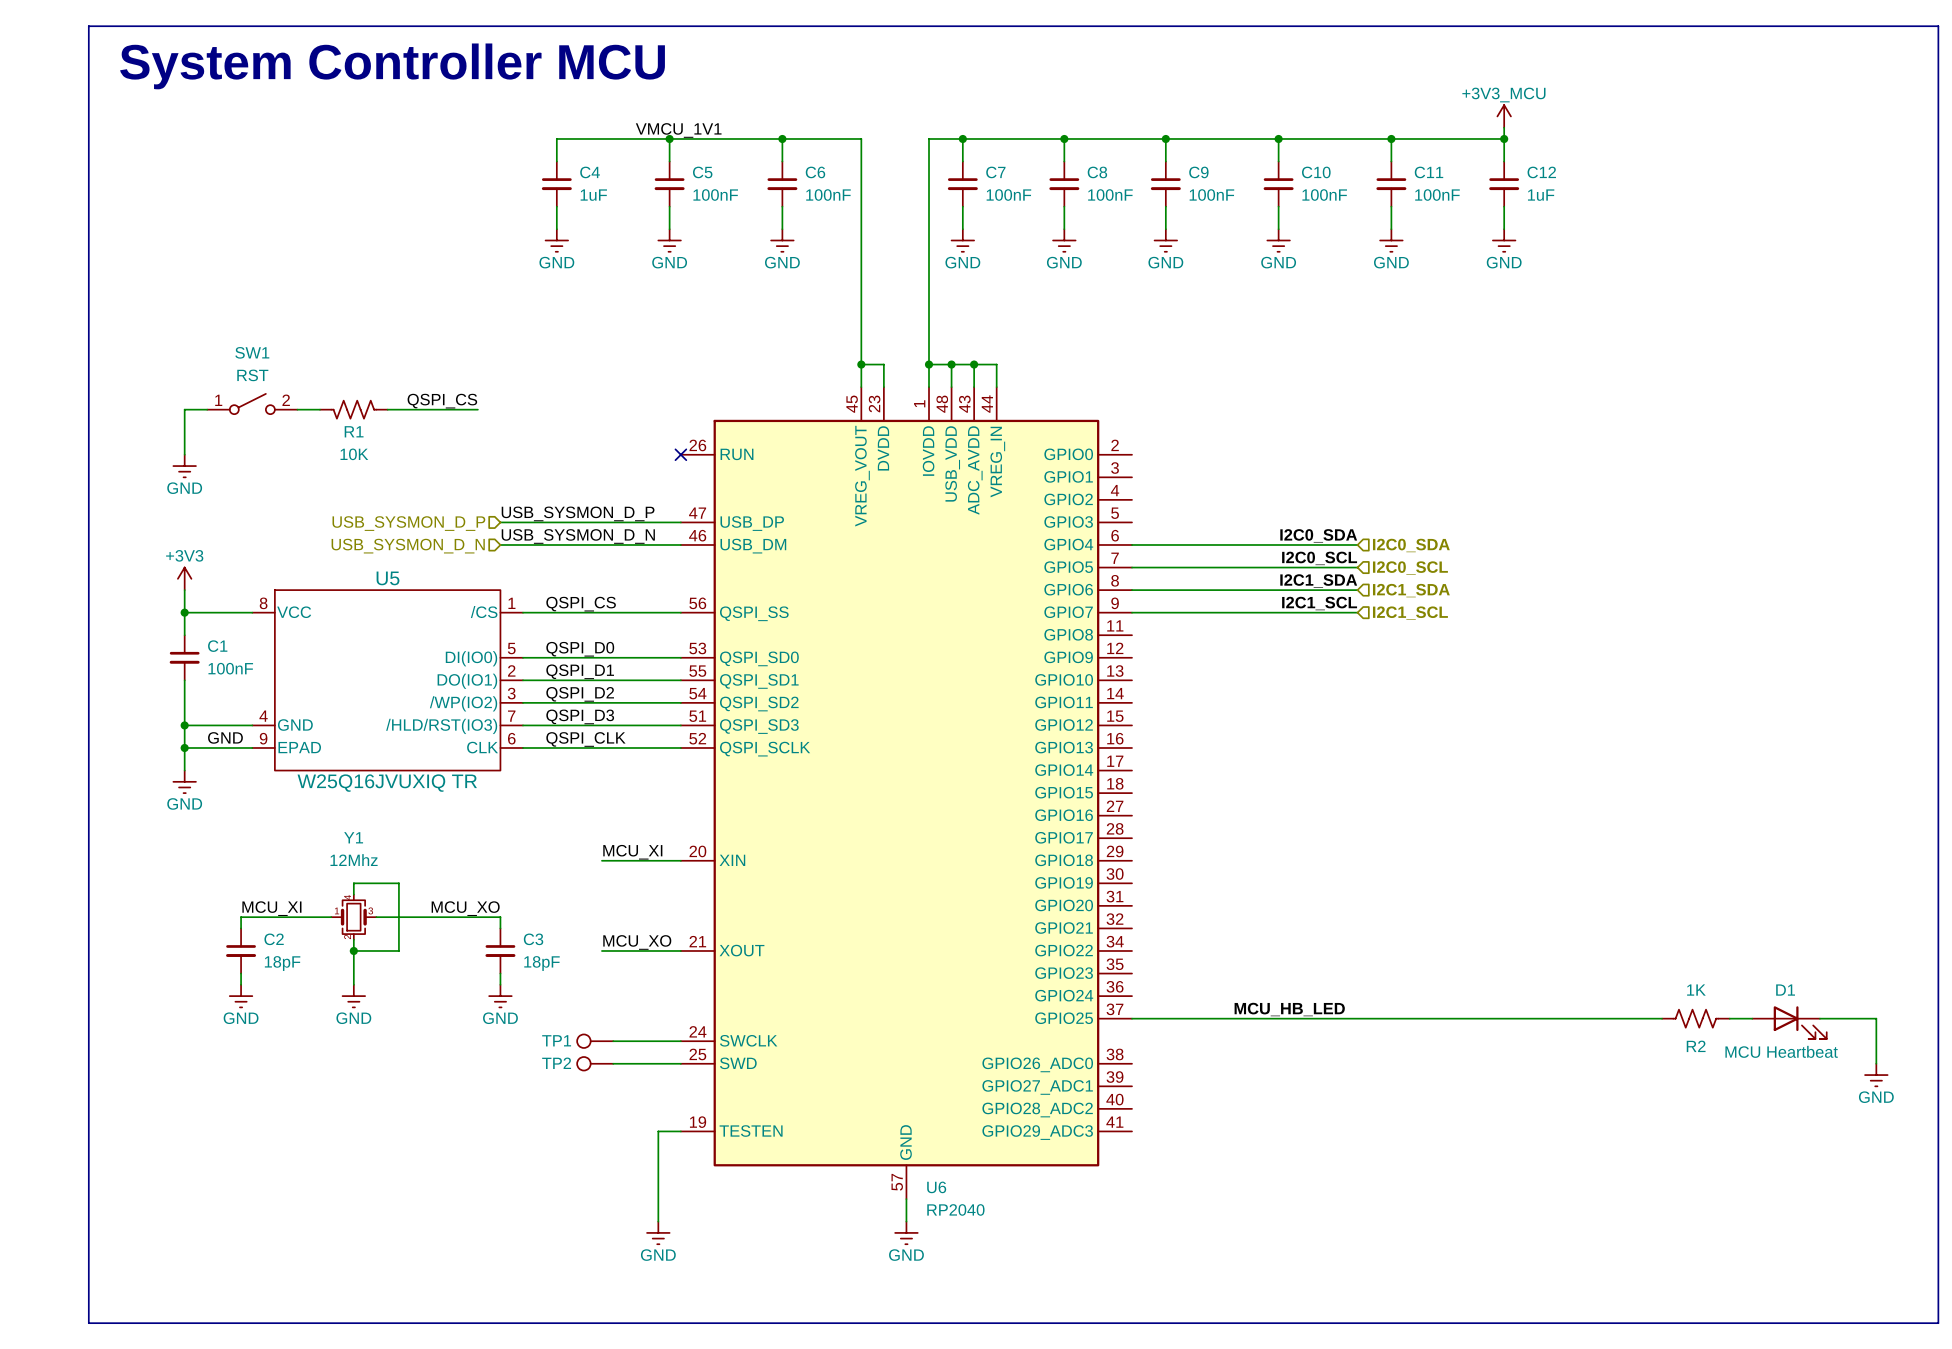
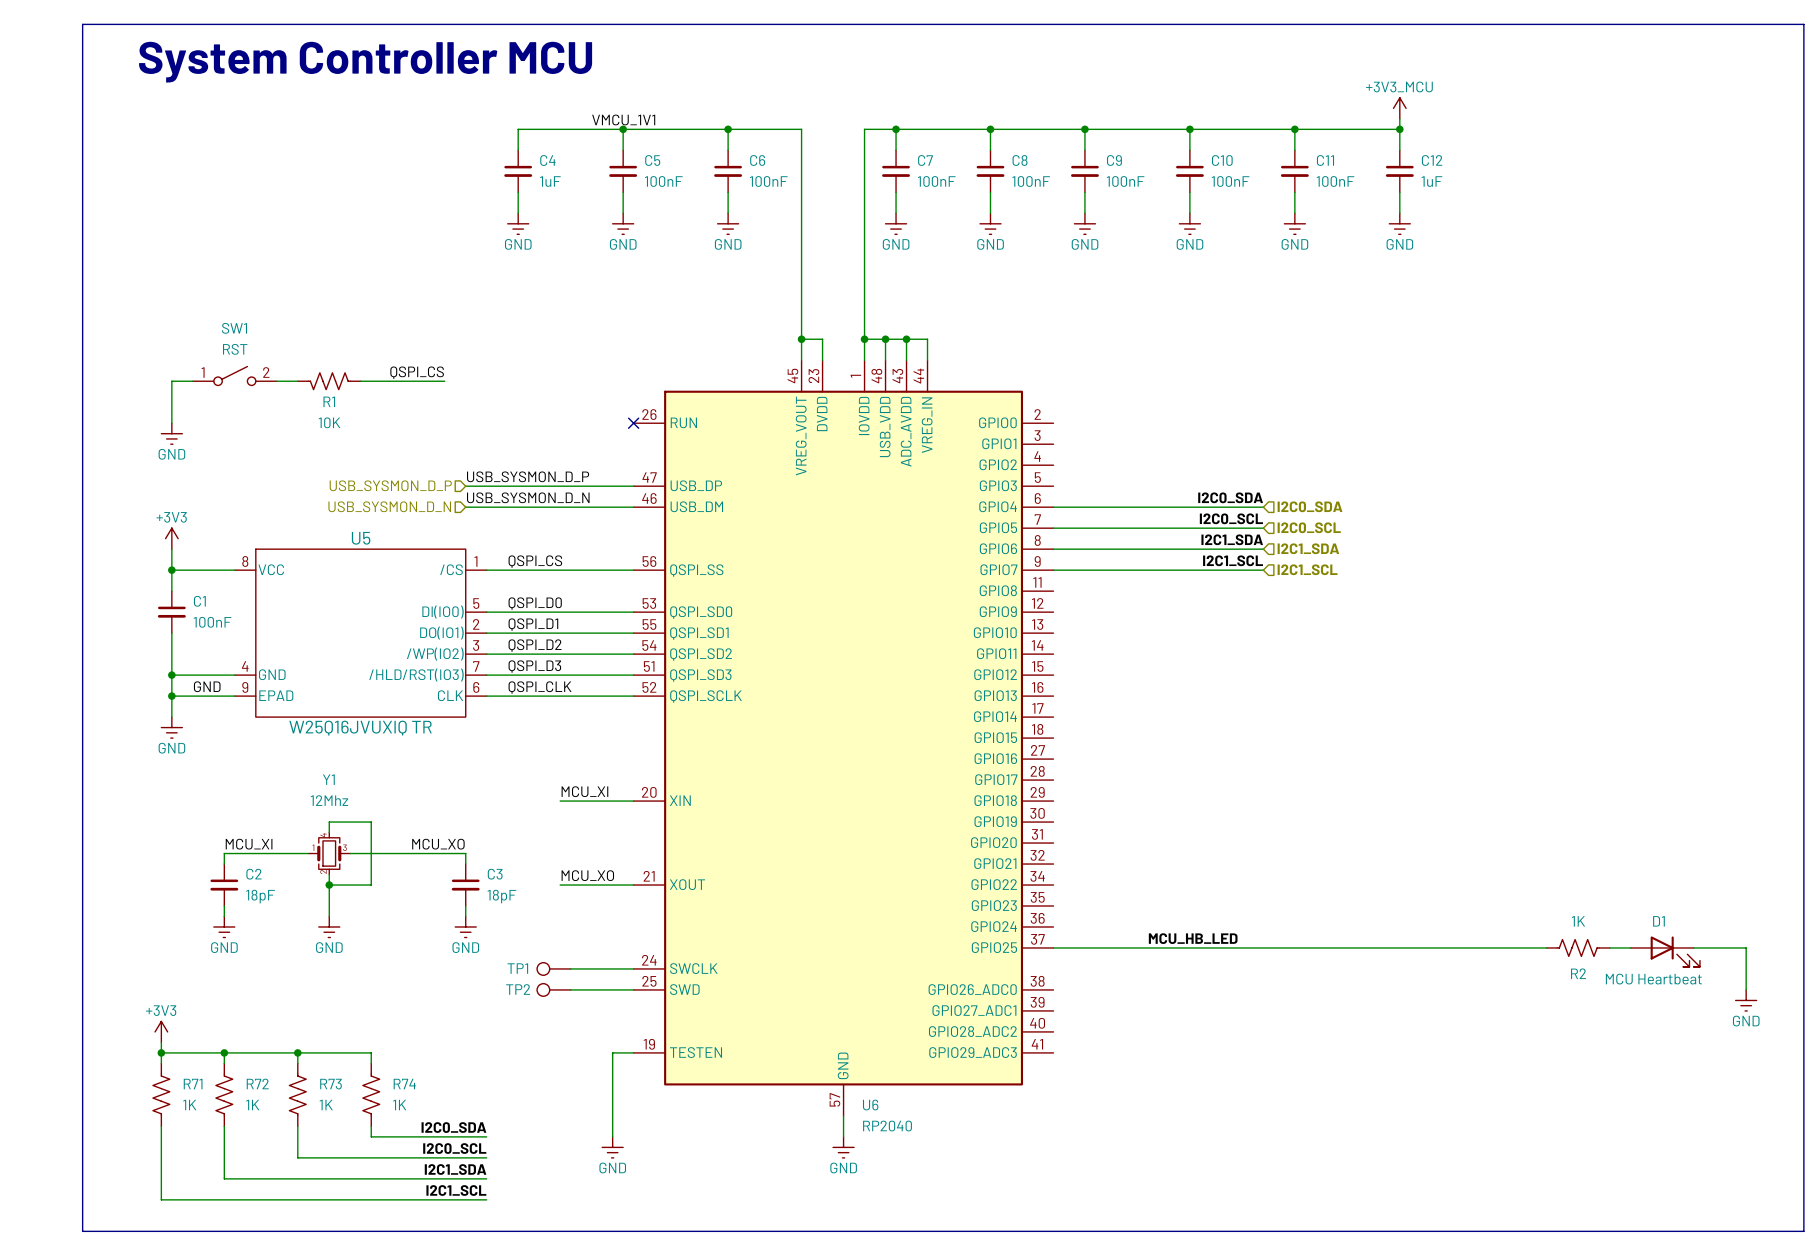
power symbol: none -> +3V3 (161, 1031)
wire: none -> (161, 1042) (161, 1063)
wire: none -> (161, 1052) (371, 1052) (371, 1063)
junction: none -> (161, 1052)
wire: none -> (224, 1052) (224, 1063)
junction: none -> (224, 1052)
wire: none -> (297, 1052) (297, 1063)
junction: none -> (297, 1052)
R71: none -> 1K (161, 1094)
R72: none -> 1K (224, 1094)
R73: none -> 1K (297, 1094)
R74: none -> 1K (371, 1094)
wire: none -> (161, 1126) (161, 1199) (486, 1199)
wire: none -> (224, 1126) (224, 1178) (486, 1178)
wire: none -> (297, 1126) (297, 1157) (486, 1157)
wire: none -> (371, 1126) (371, 1136) (486, 1136)
label: none -> I2C0_SDA (453, 1127)
label: none -> I2C0_SCL (454, 1148)
label: none -> I2C1_SDA (455, 1169)
label: none -> I2C1_SCL (456, 1190)

